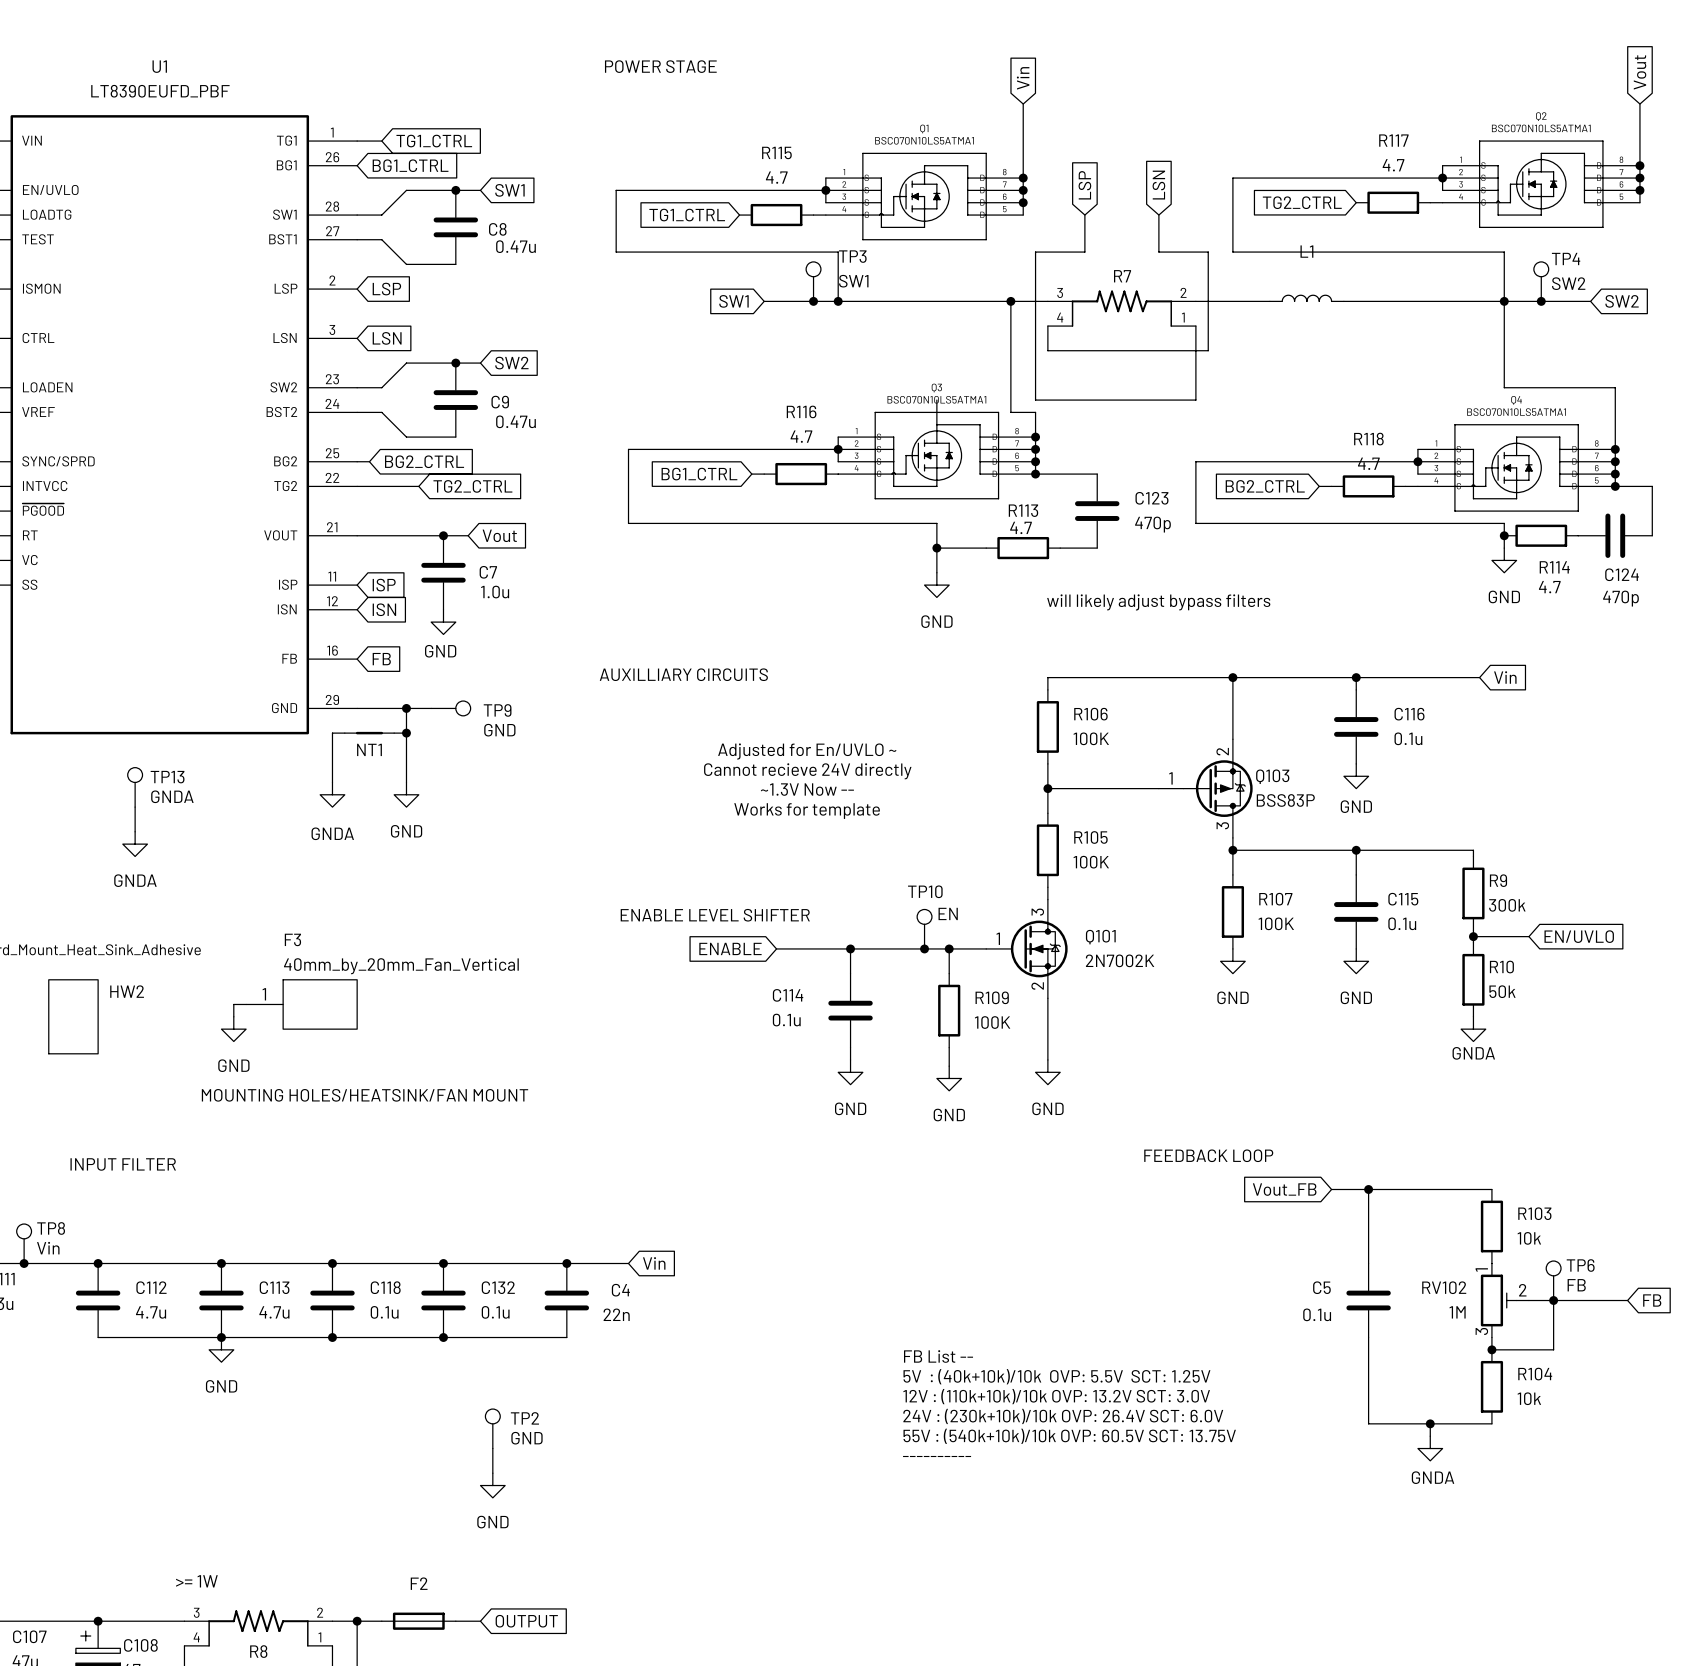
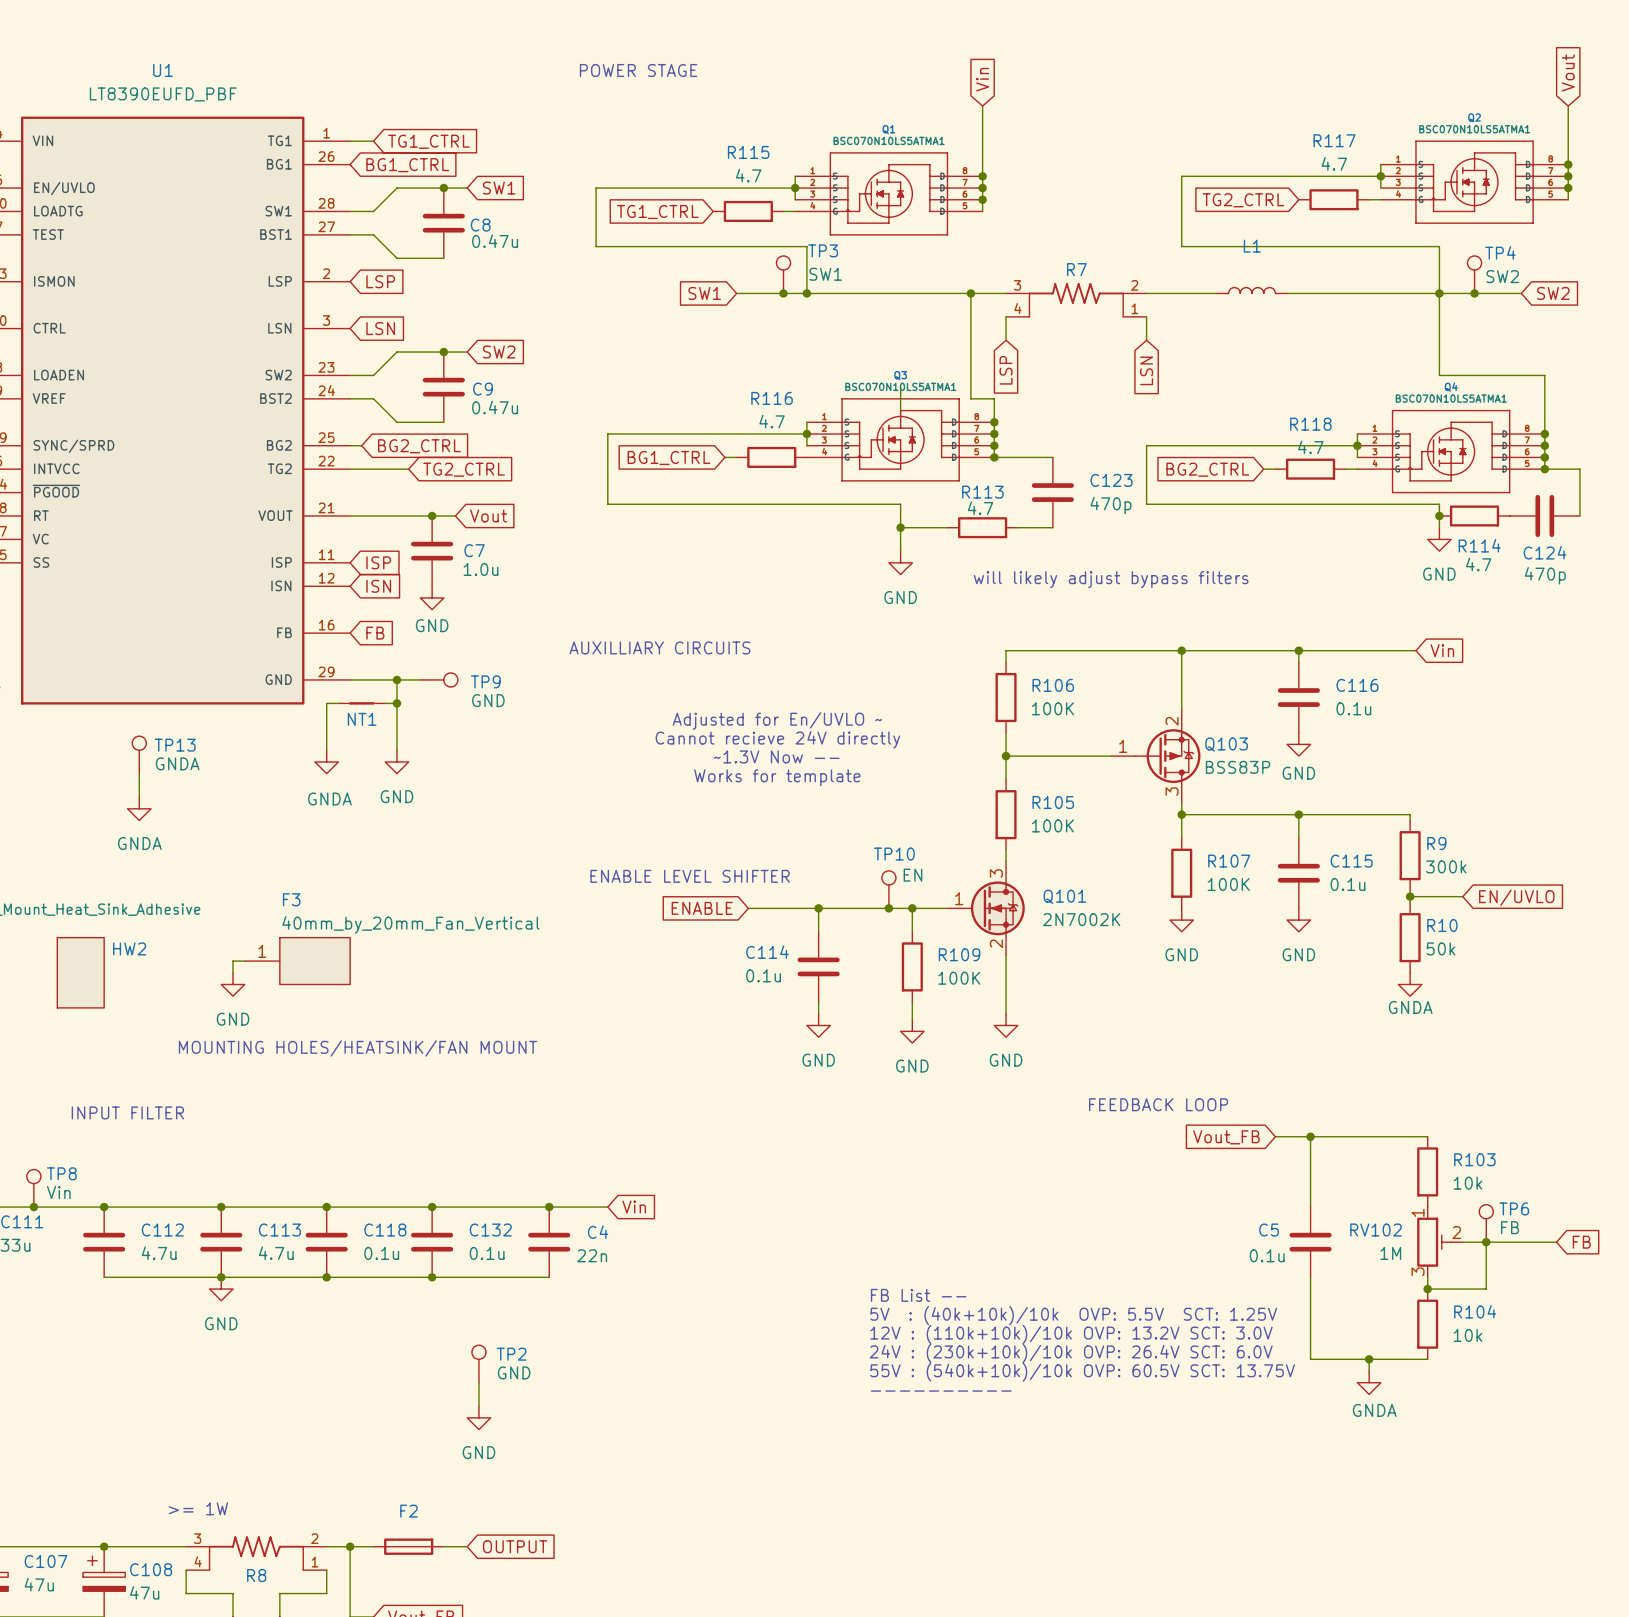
global label rotation: 0° (1084, 185) -> 180° (1006, 370)
global label position: LSP (1084, 185) -> LSP (1006, 370)
global label rotation: 0° (1158, 185) -> 180° (1146, 370)
global label position: LSN (1158, 185) -> LSN (1146, 370)
wire: (1084, 215) (1084, 252) (1035, 252) (1035, 400) (1195, 400) (1195, 350) -> none
wire: (1158, 215) (1158, 252) (1208, 252) (1208, 350) (1047, 350) -> none

